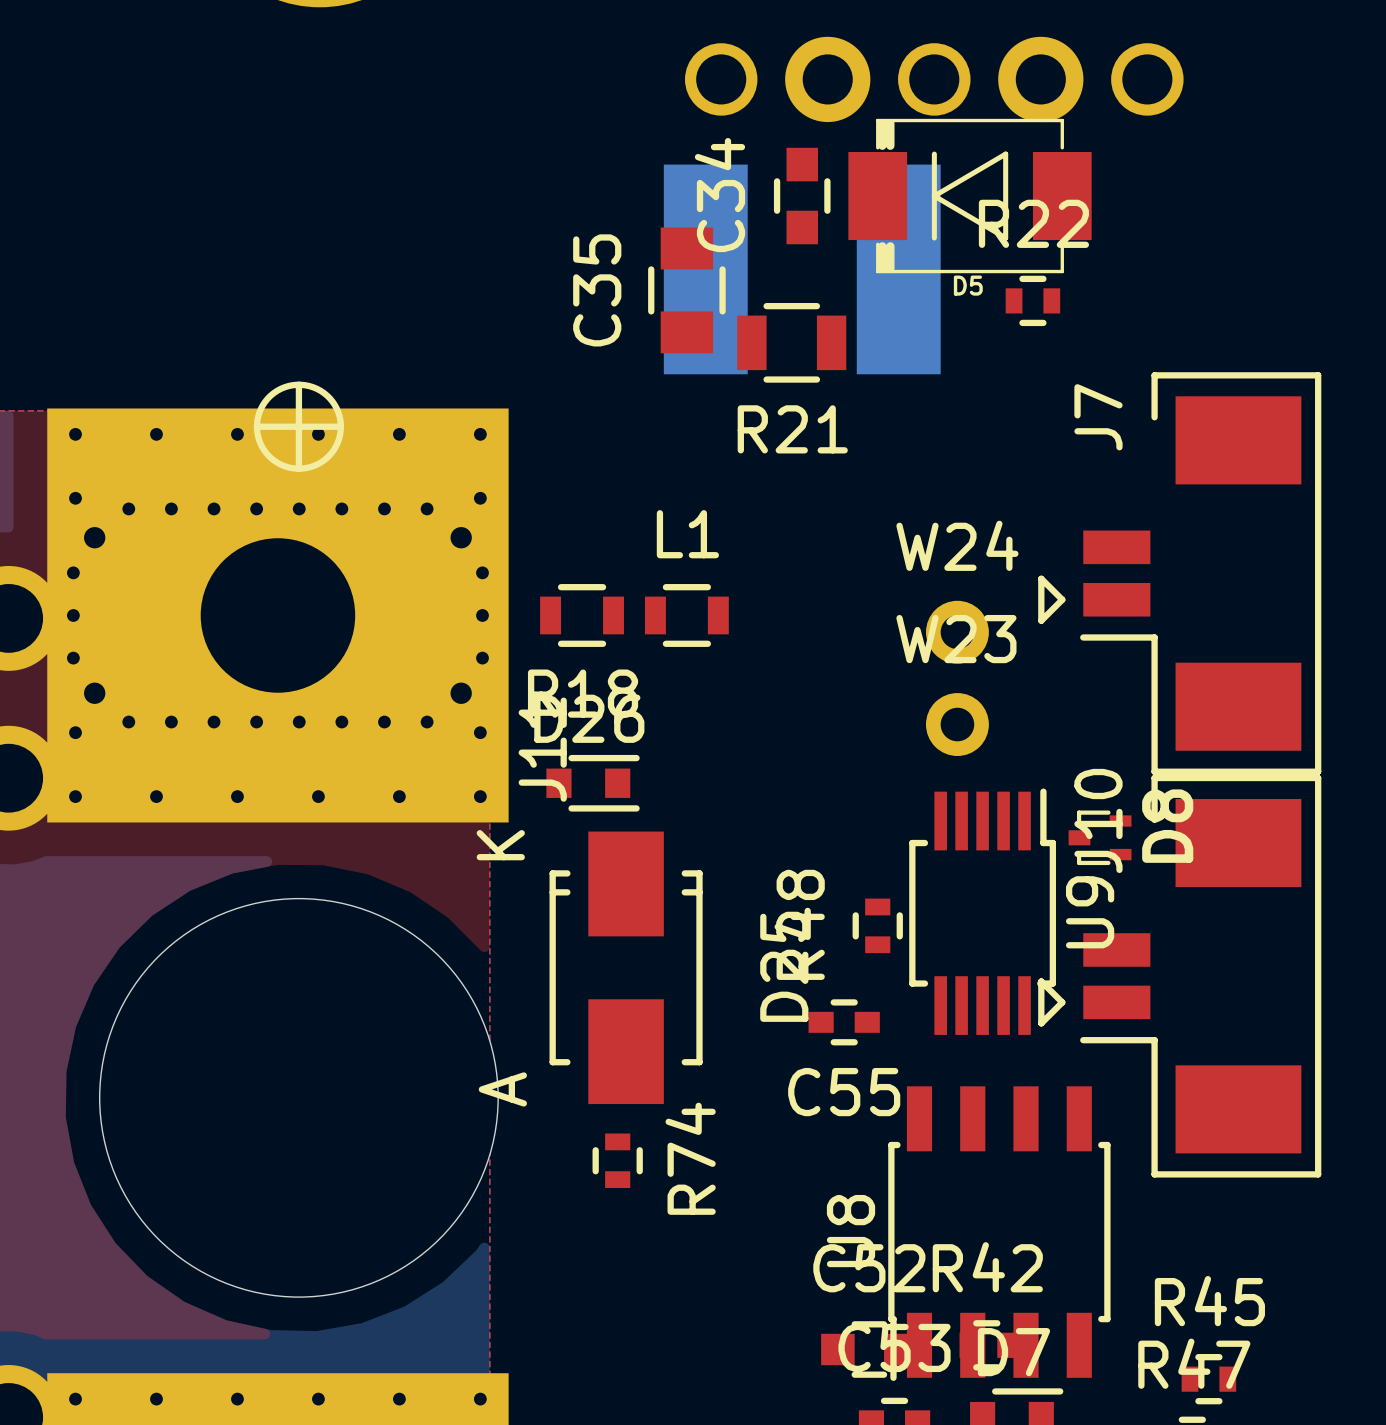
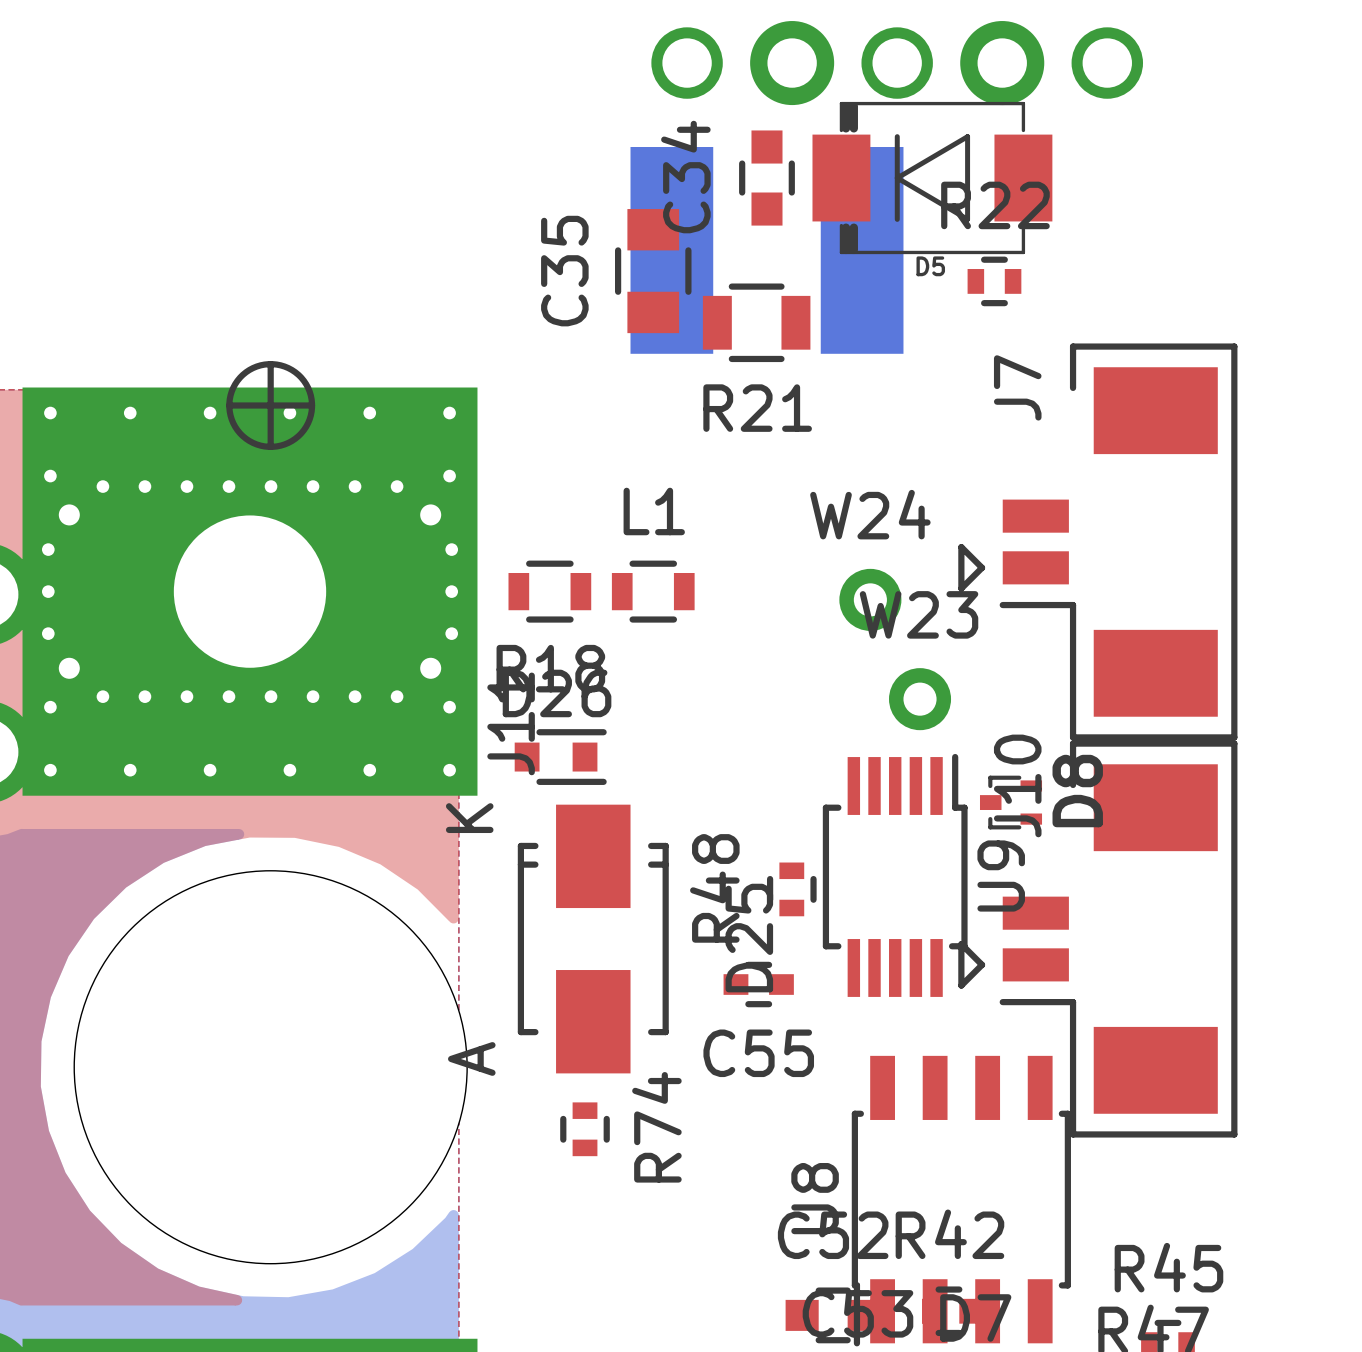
J7 position: (1179, 573) -> (1097, 541)
W24 position: (957, 632) -> (870, 599)
D8 position: (1100, 837) -> (1011, 802)
U9 position: (982, 911) -> (895, 875)
R48 position: (877, 925) -> (791, 889)
J10 position: (1179, 976) -> (1097, 939)
C55 position: (844, 1022) -> (758, 984)

